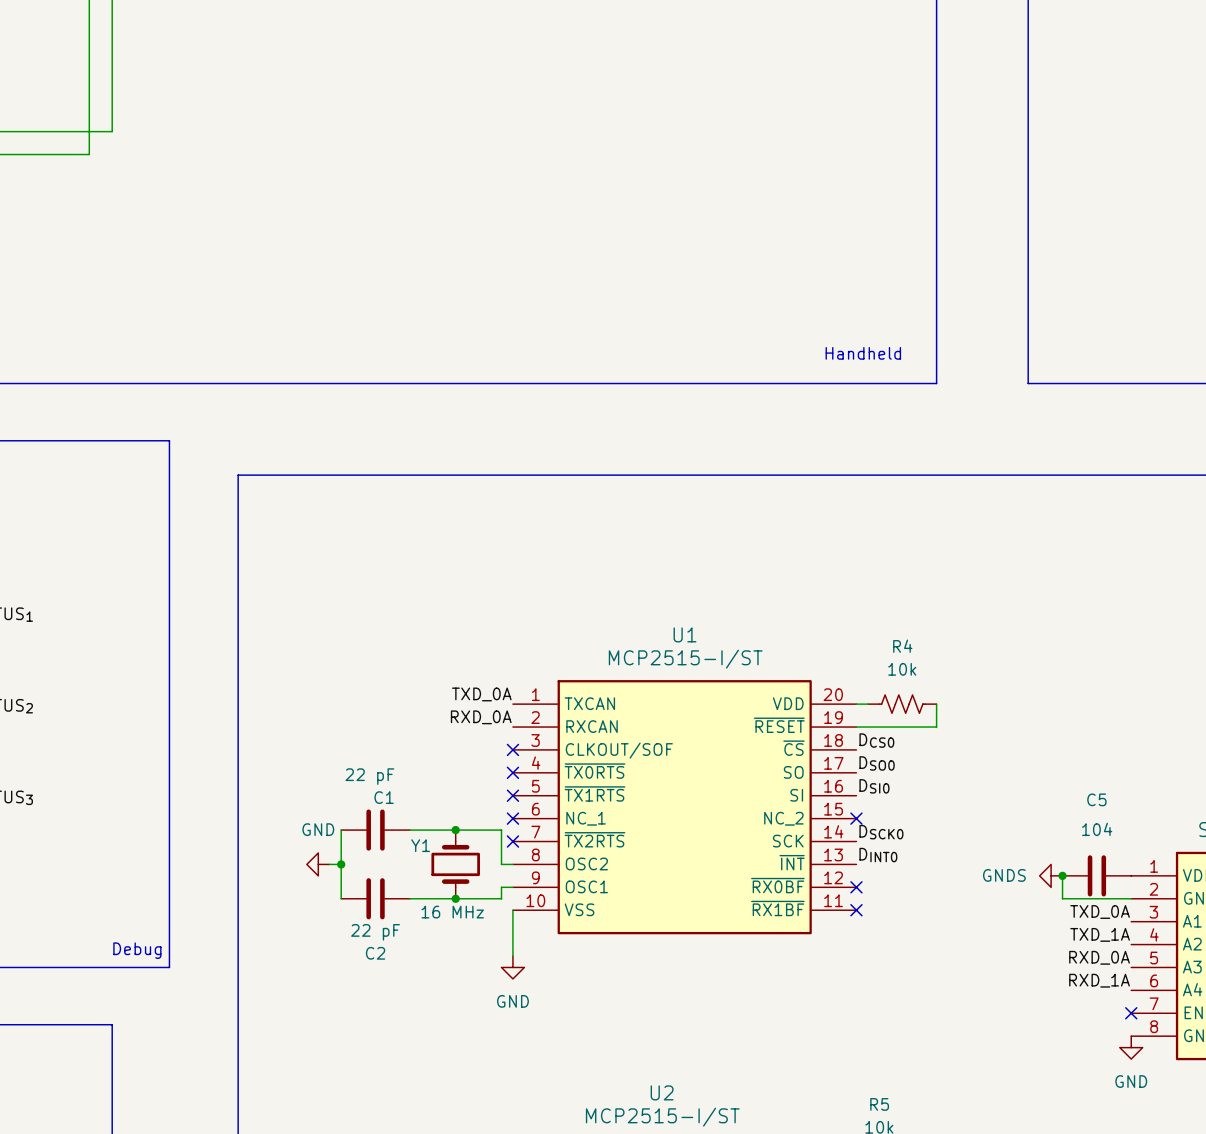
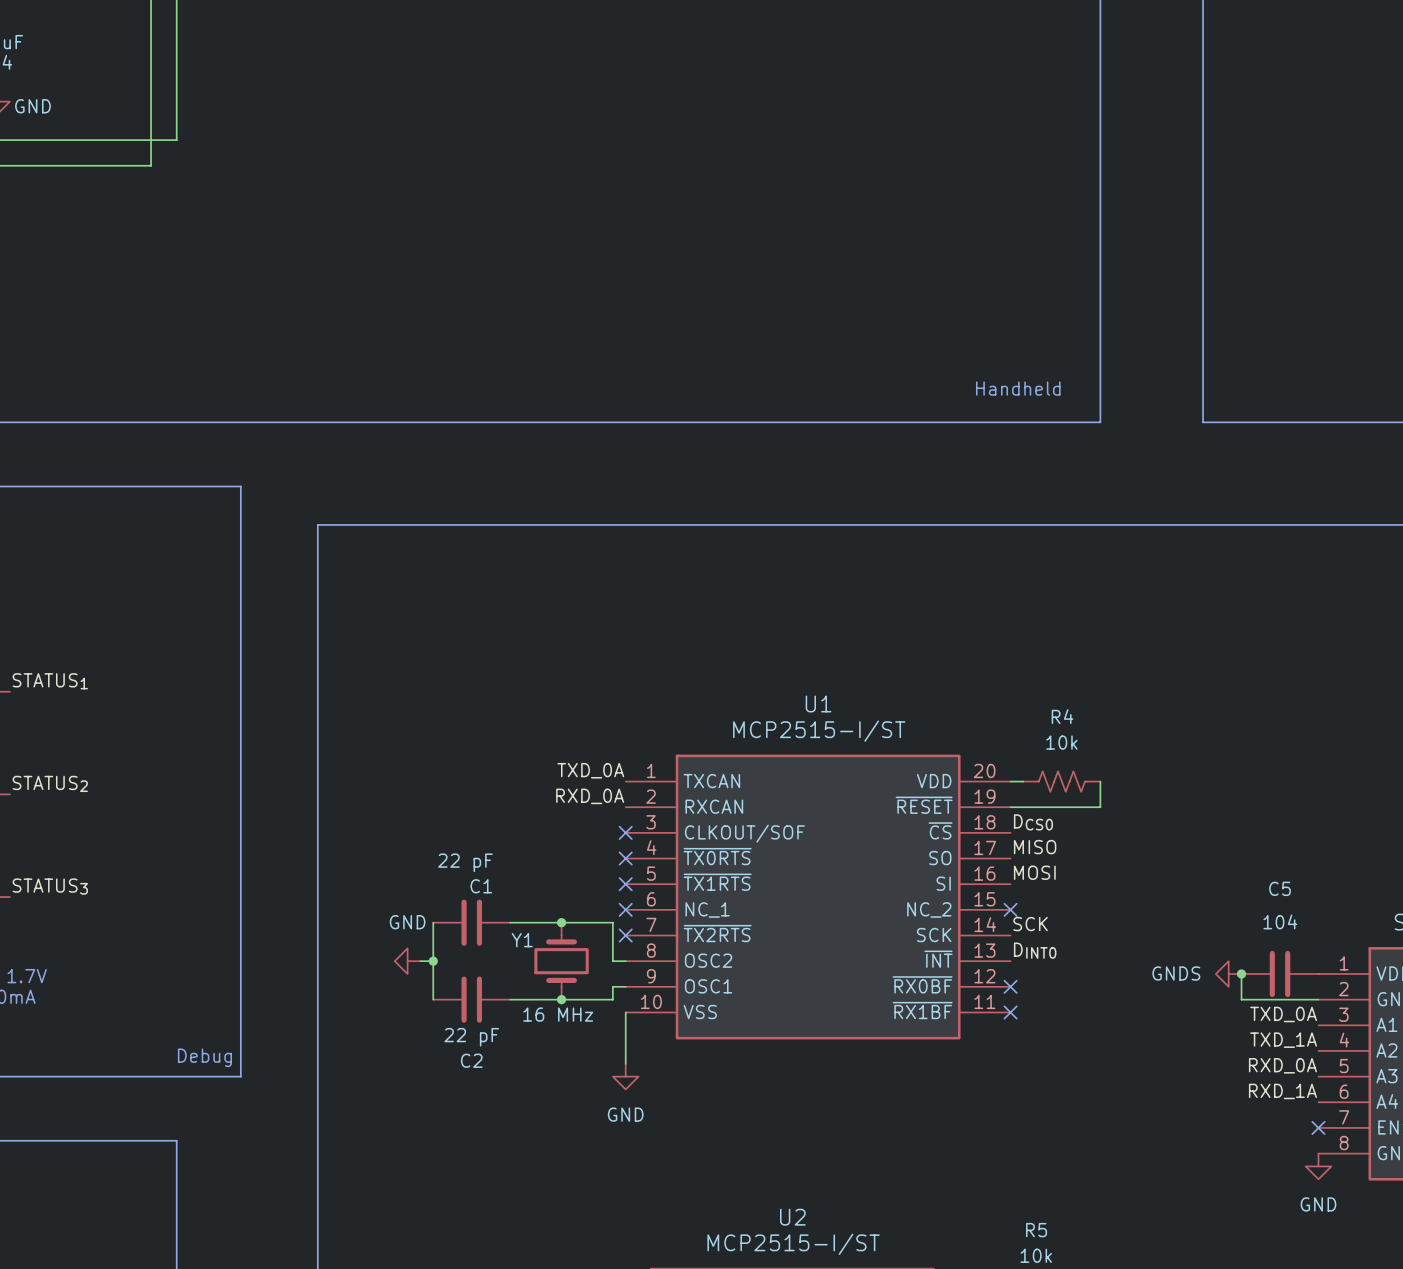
label: DSO0 (877, 763) -> MISO (1035, 847)
label: DSI0 (874, 786) -> MOSI (1034, 872)
label: DSCK0 (881, 832) -> SCK (1030, 924)

